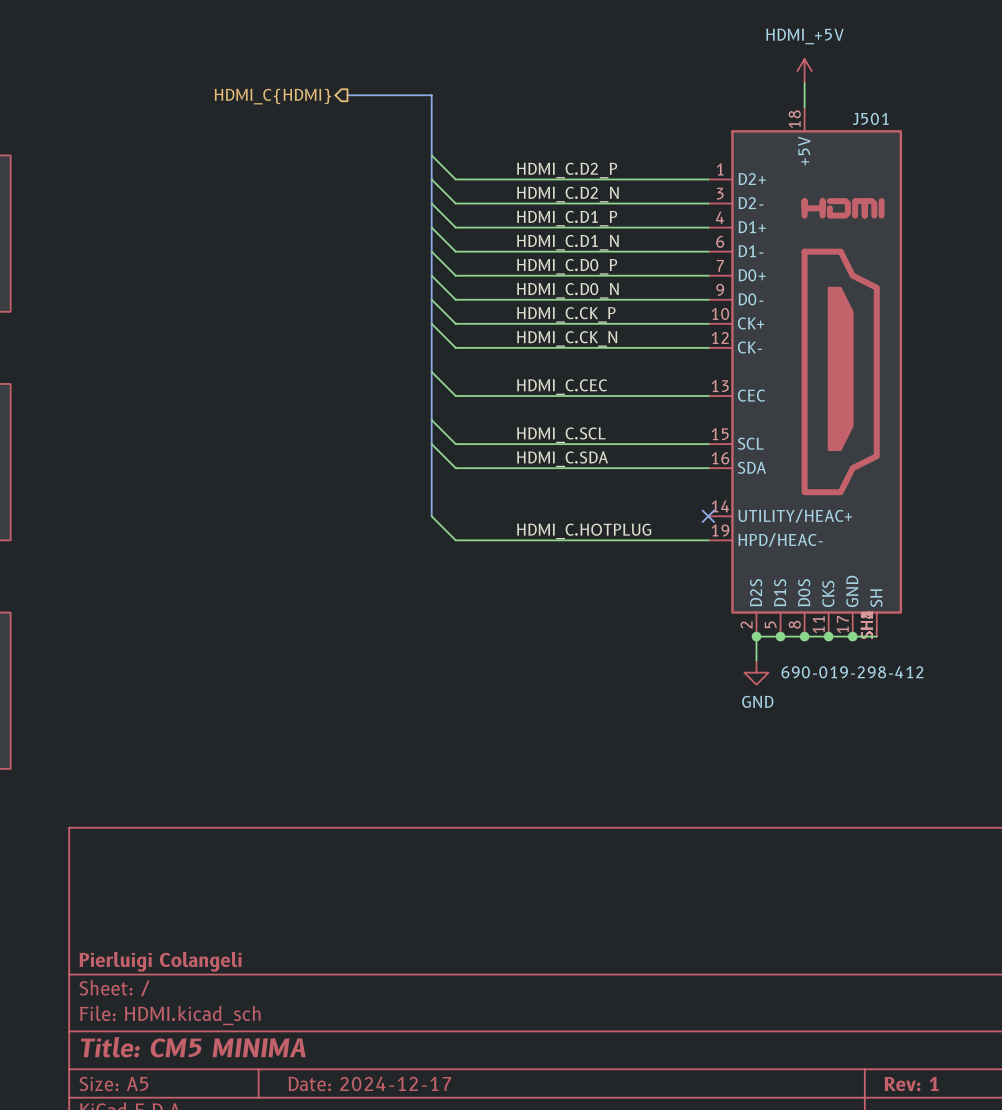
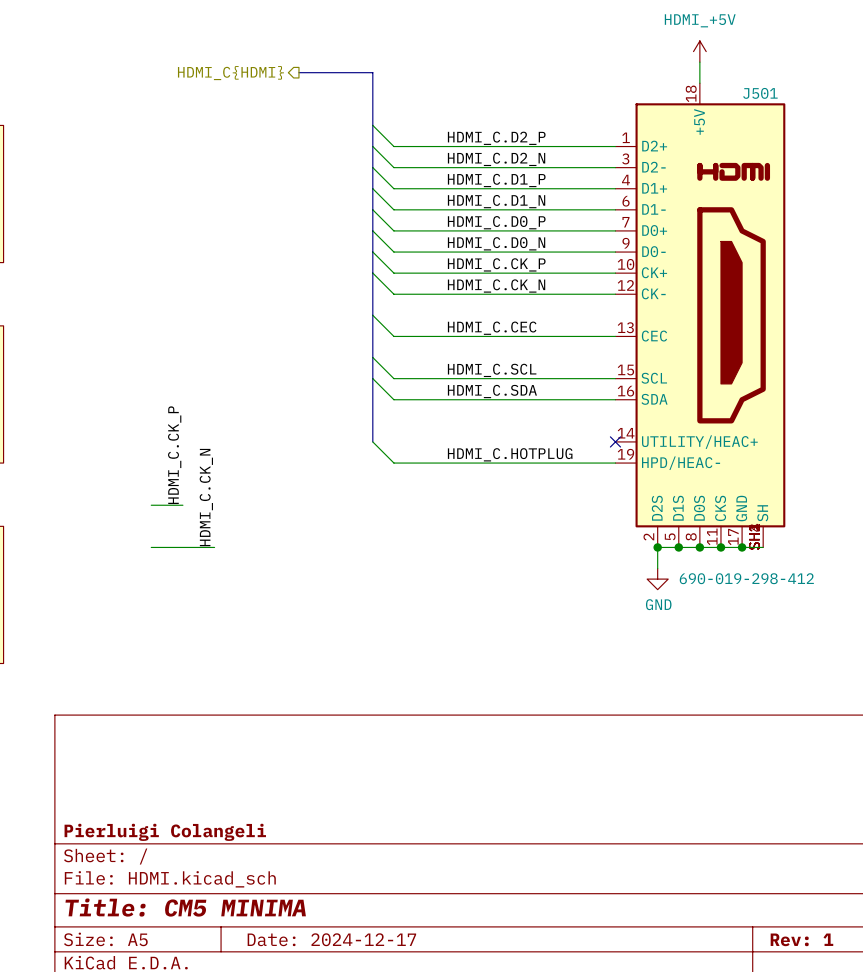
label: none -> HDMI_C.CK_P (174, 455)
label: none -> HDMI_C.CK_N (206, 497)
wire: none -> (151, 505) (182, 505)
wire: none -> (151, 547) (214, 547)

